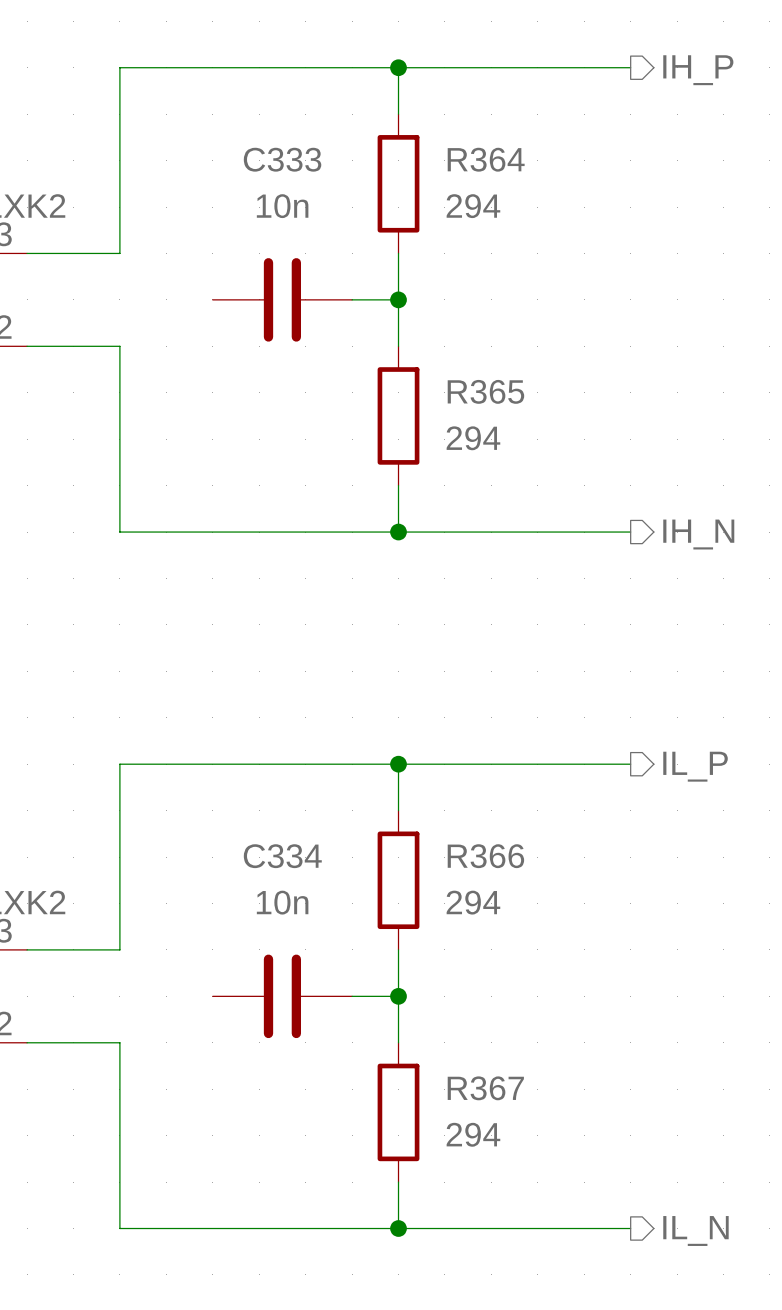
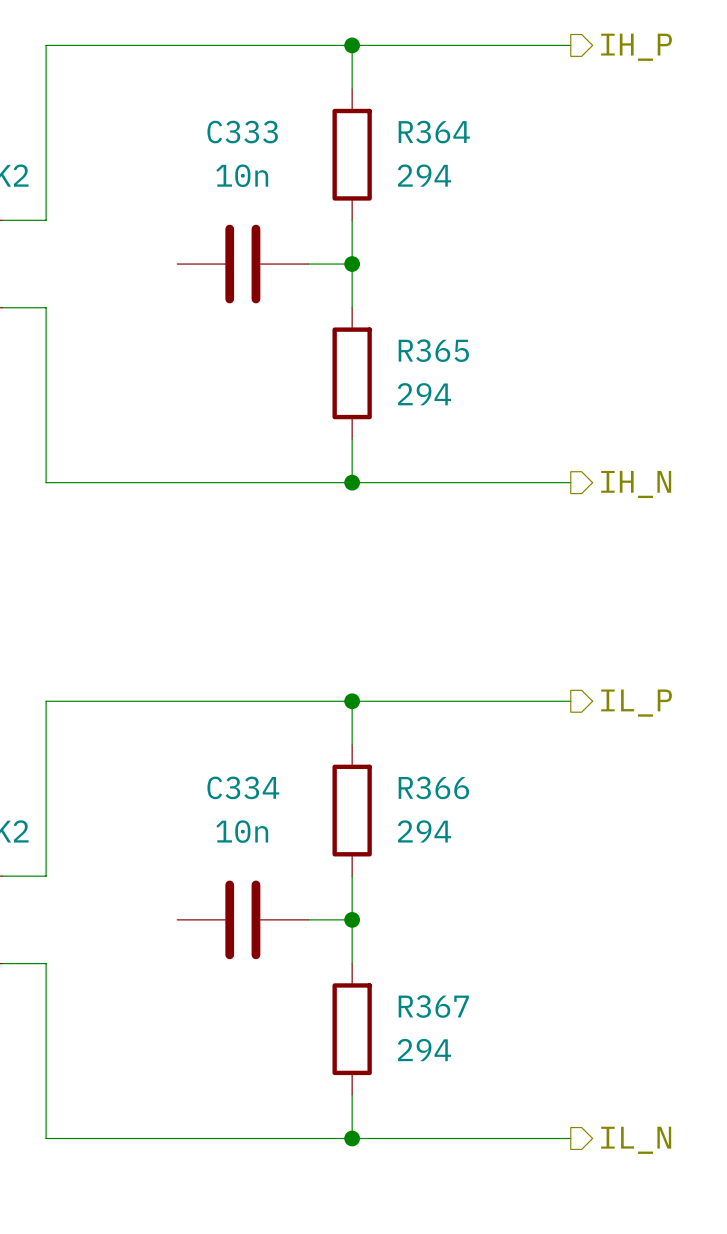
wire: (119, 67) (119, 253) (73, 253) -> (89, 45) (46, 45) (46, 220)
wire: (73, 346) (119, 346) (119, 532) -> (46, 307) (46, 482) (89, 482)
wire: (119, 764) (119, 949) (73, 949) -> (89, 701) (46, 701) (46, 876)
wire: (73, 1042) (119, 1042) (119, 1228) -> (46, 963) (46, 1138) (89, 1138)

